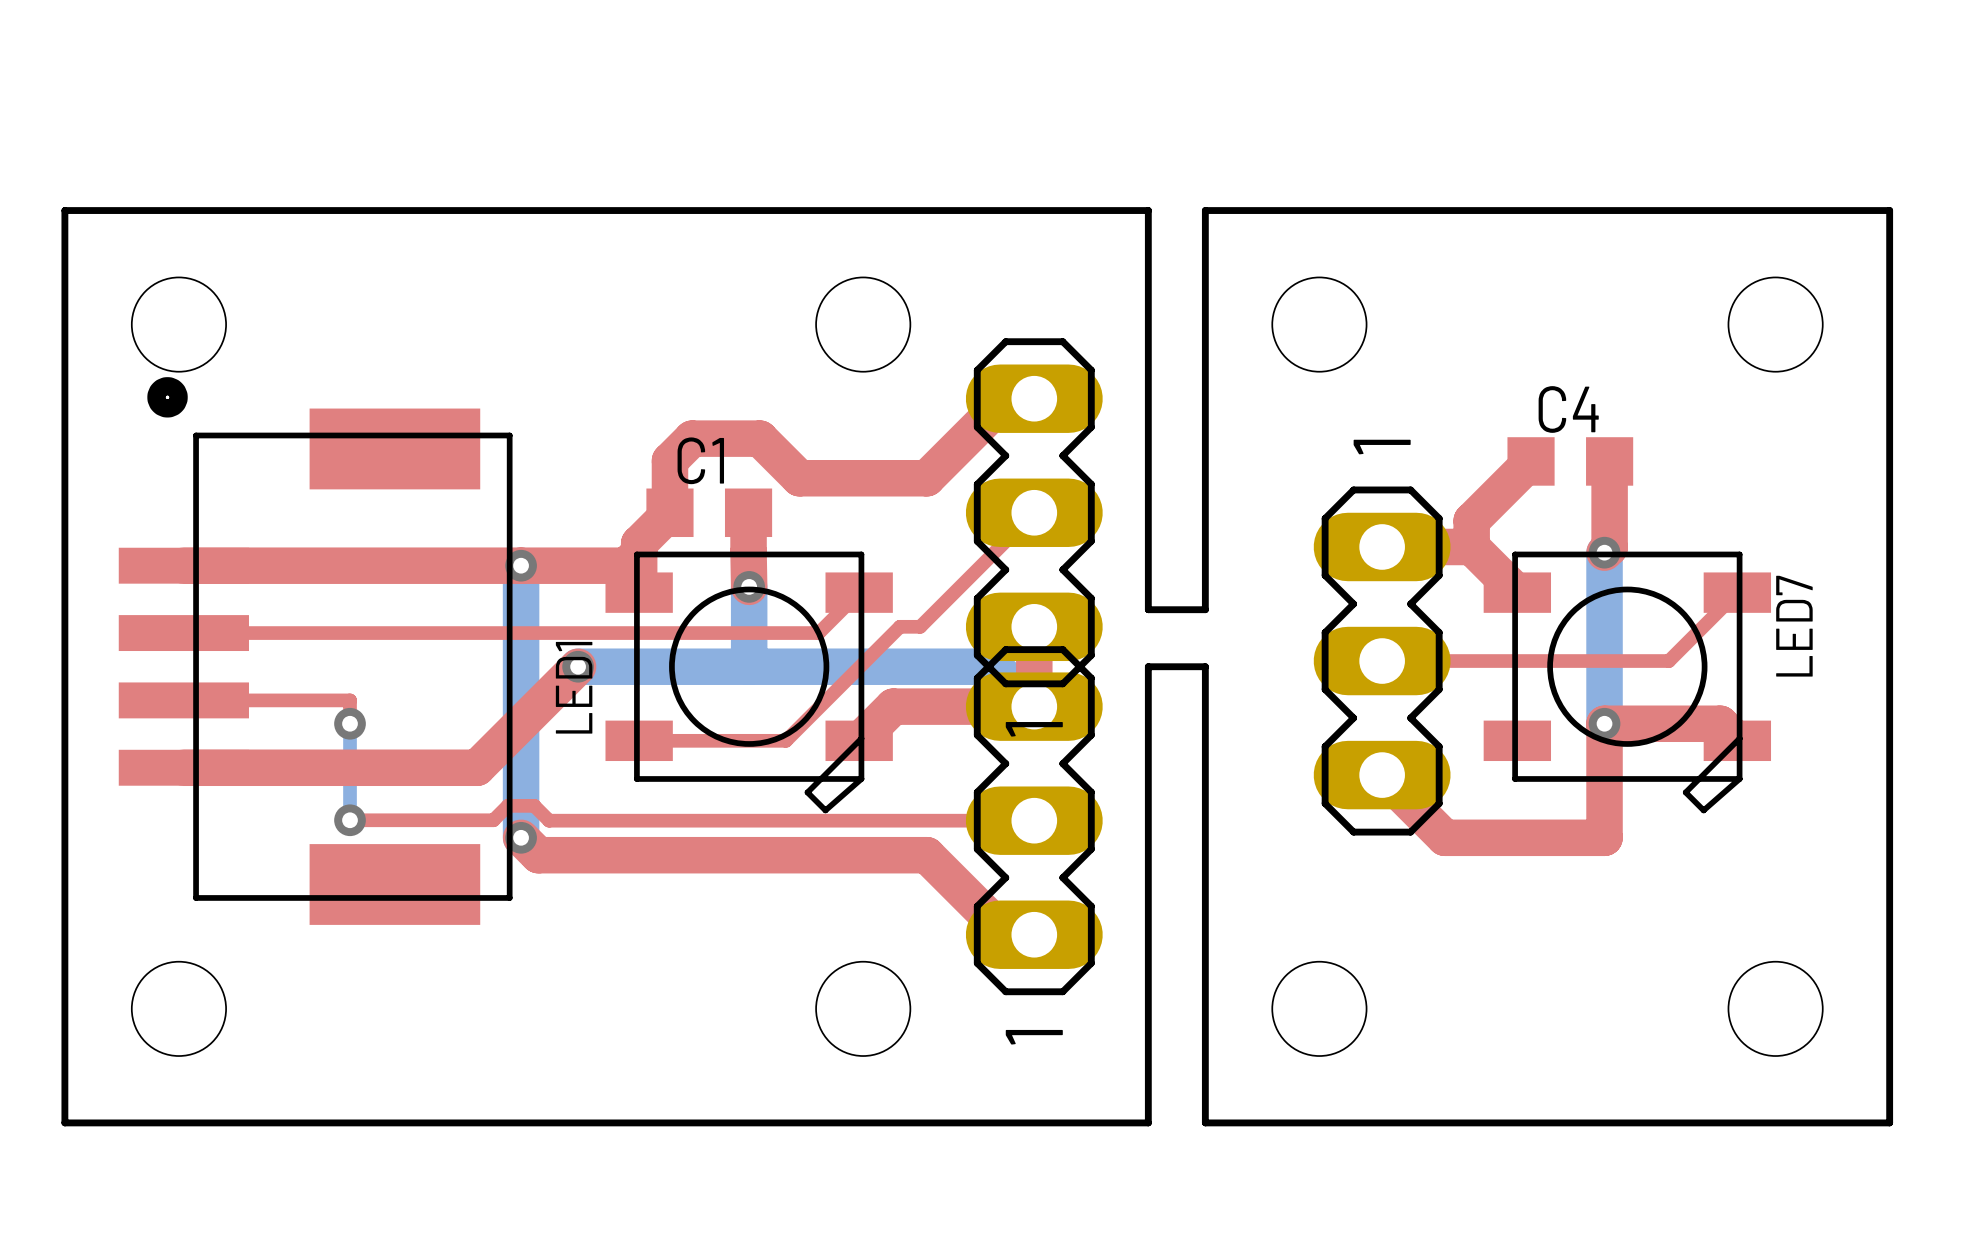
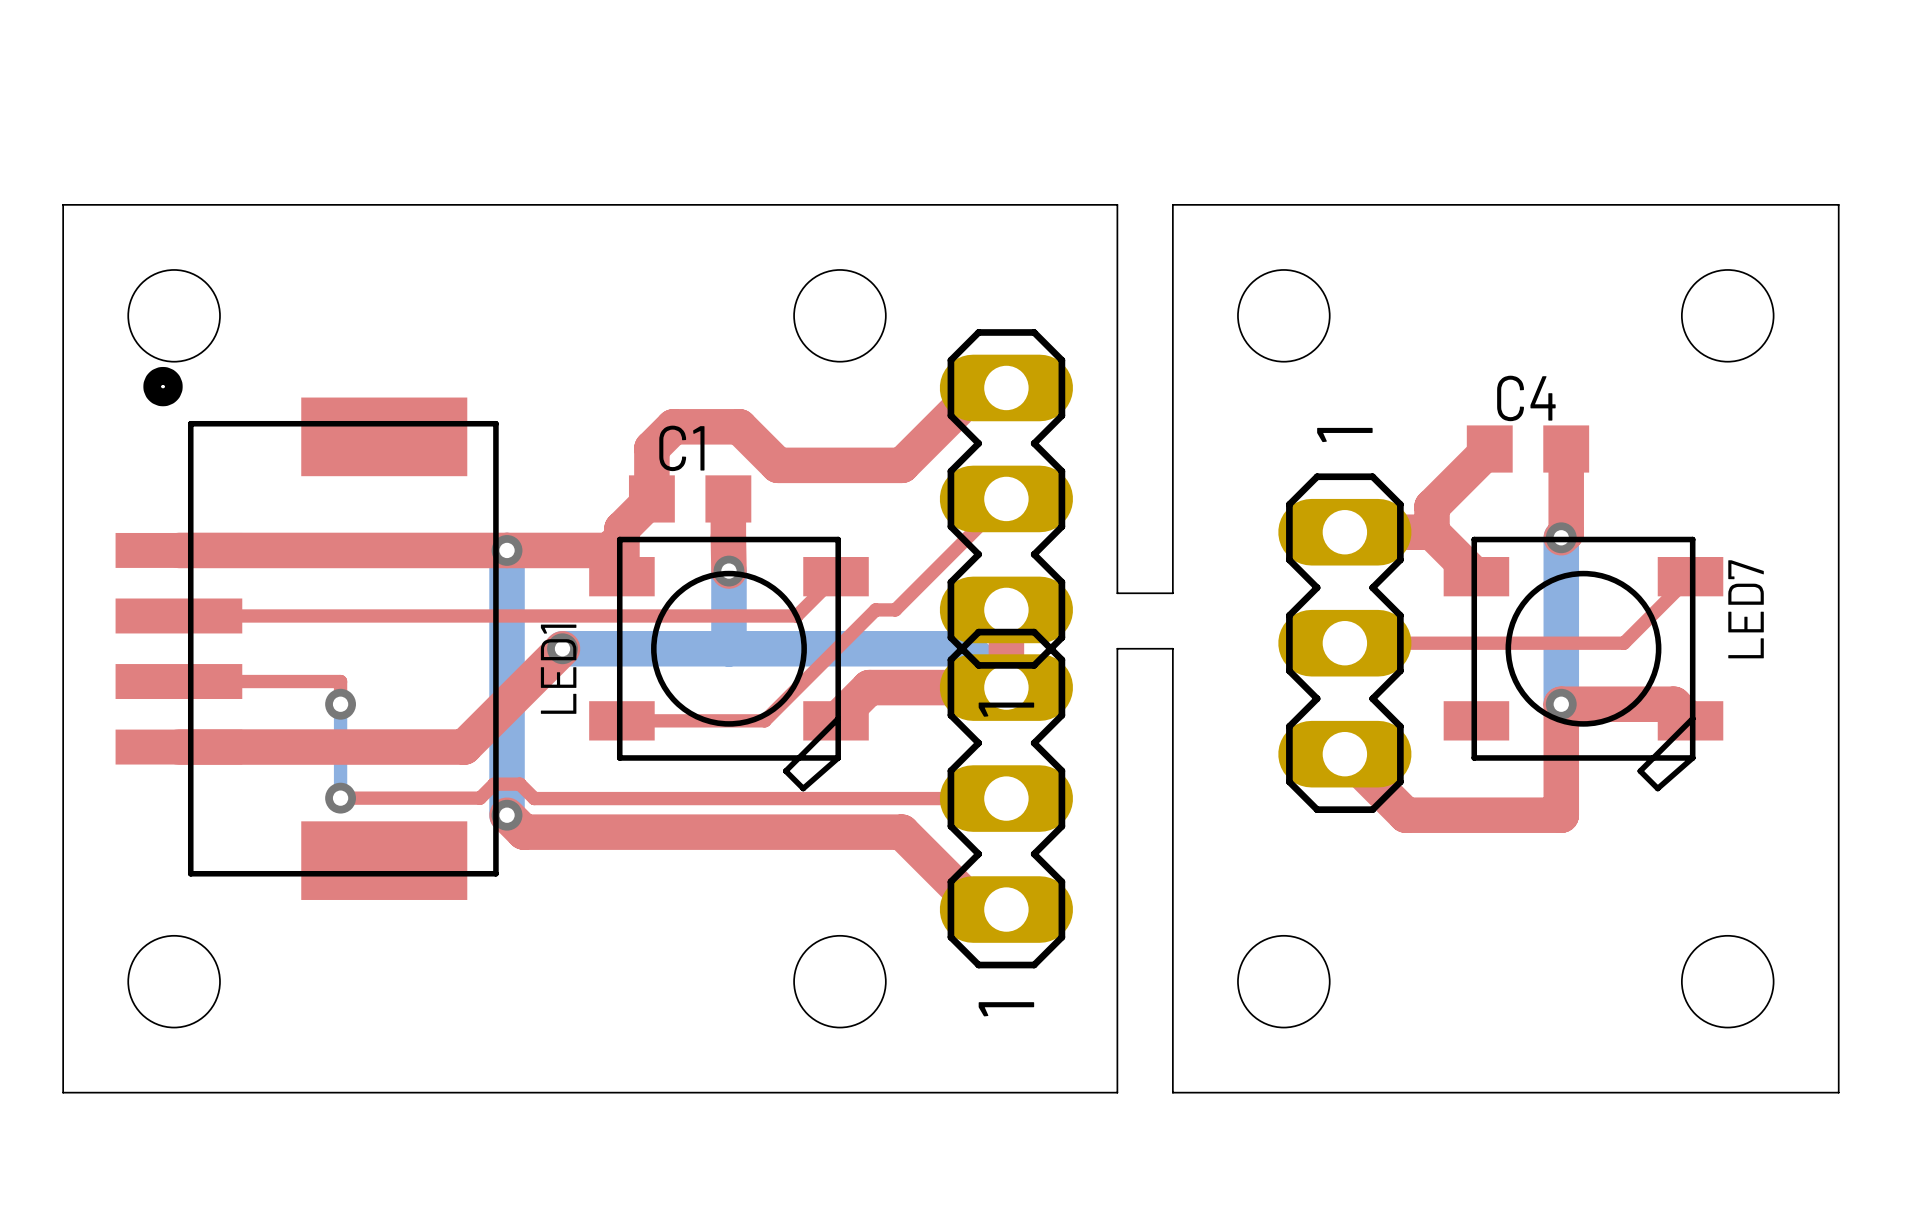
board edge width: thick (64, 210) (64, 1122) (1148, 1122) (1148, 666) (1205, 666) (1205, 1122) (1889, 1122) (1889, 210) (1205, 210) (1205, 609) (1148, 609) (1148, 210) (64, 210) -> thin (63, 204) (63, 1092) (1117, 1092) (1117, 648) (1172, 648) (1172, 1092) (1838, 1092) (1838, 204) (1172, 204) (1172, 593) (1117, 593) (1117, 204) (63, 204)

